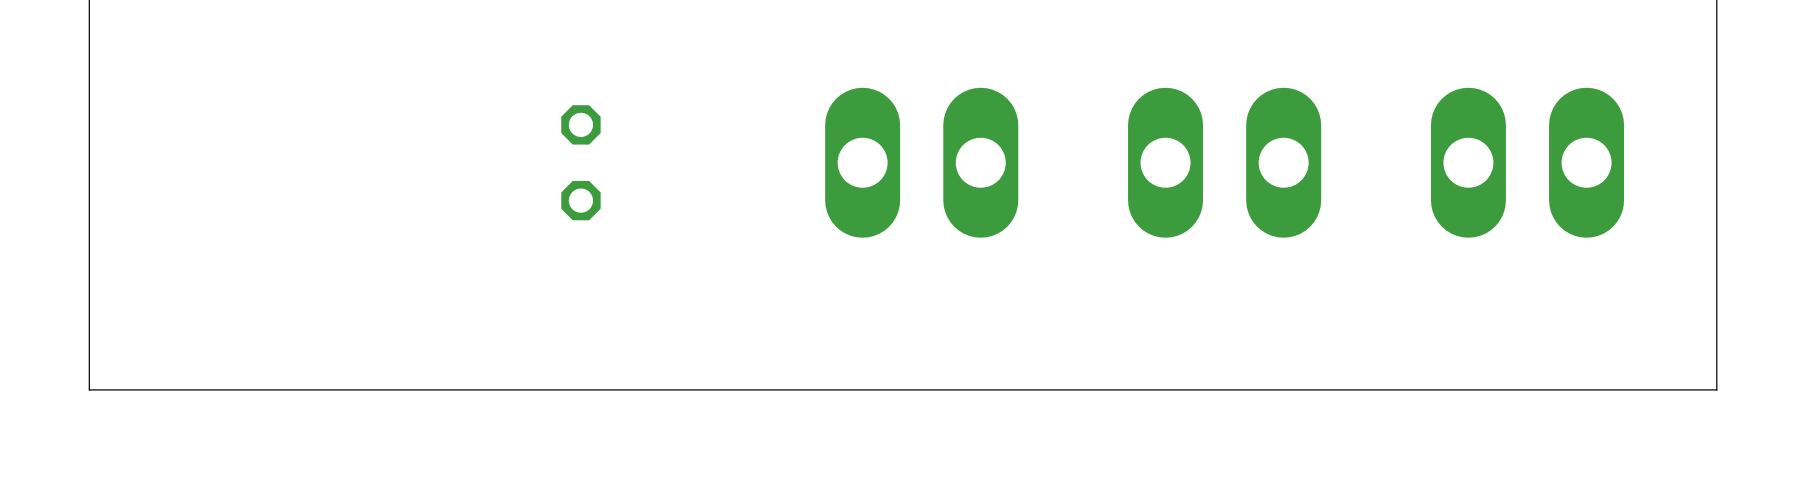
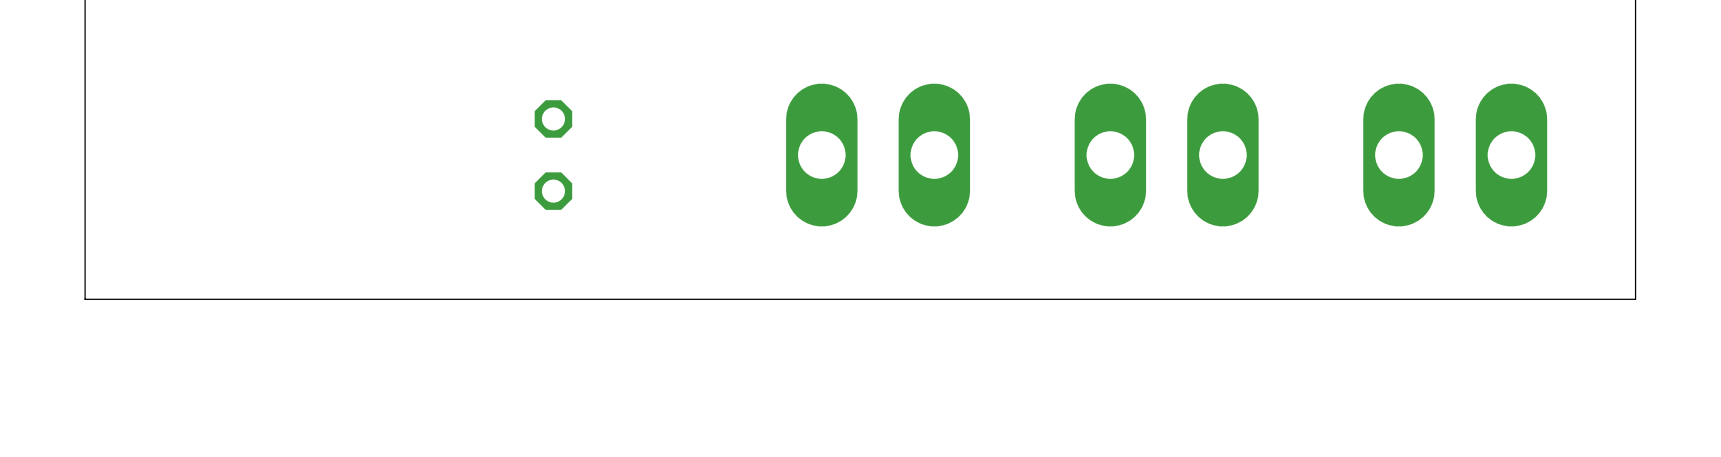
board edge: (1716, 314) (1716, 389) (89, 389) (89, 314) -> (1635, 299) (85, 299)

